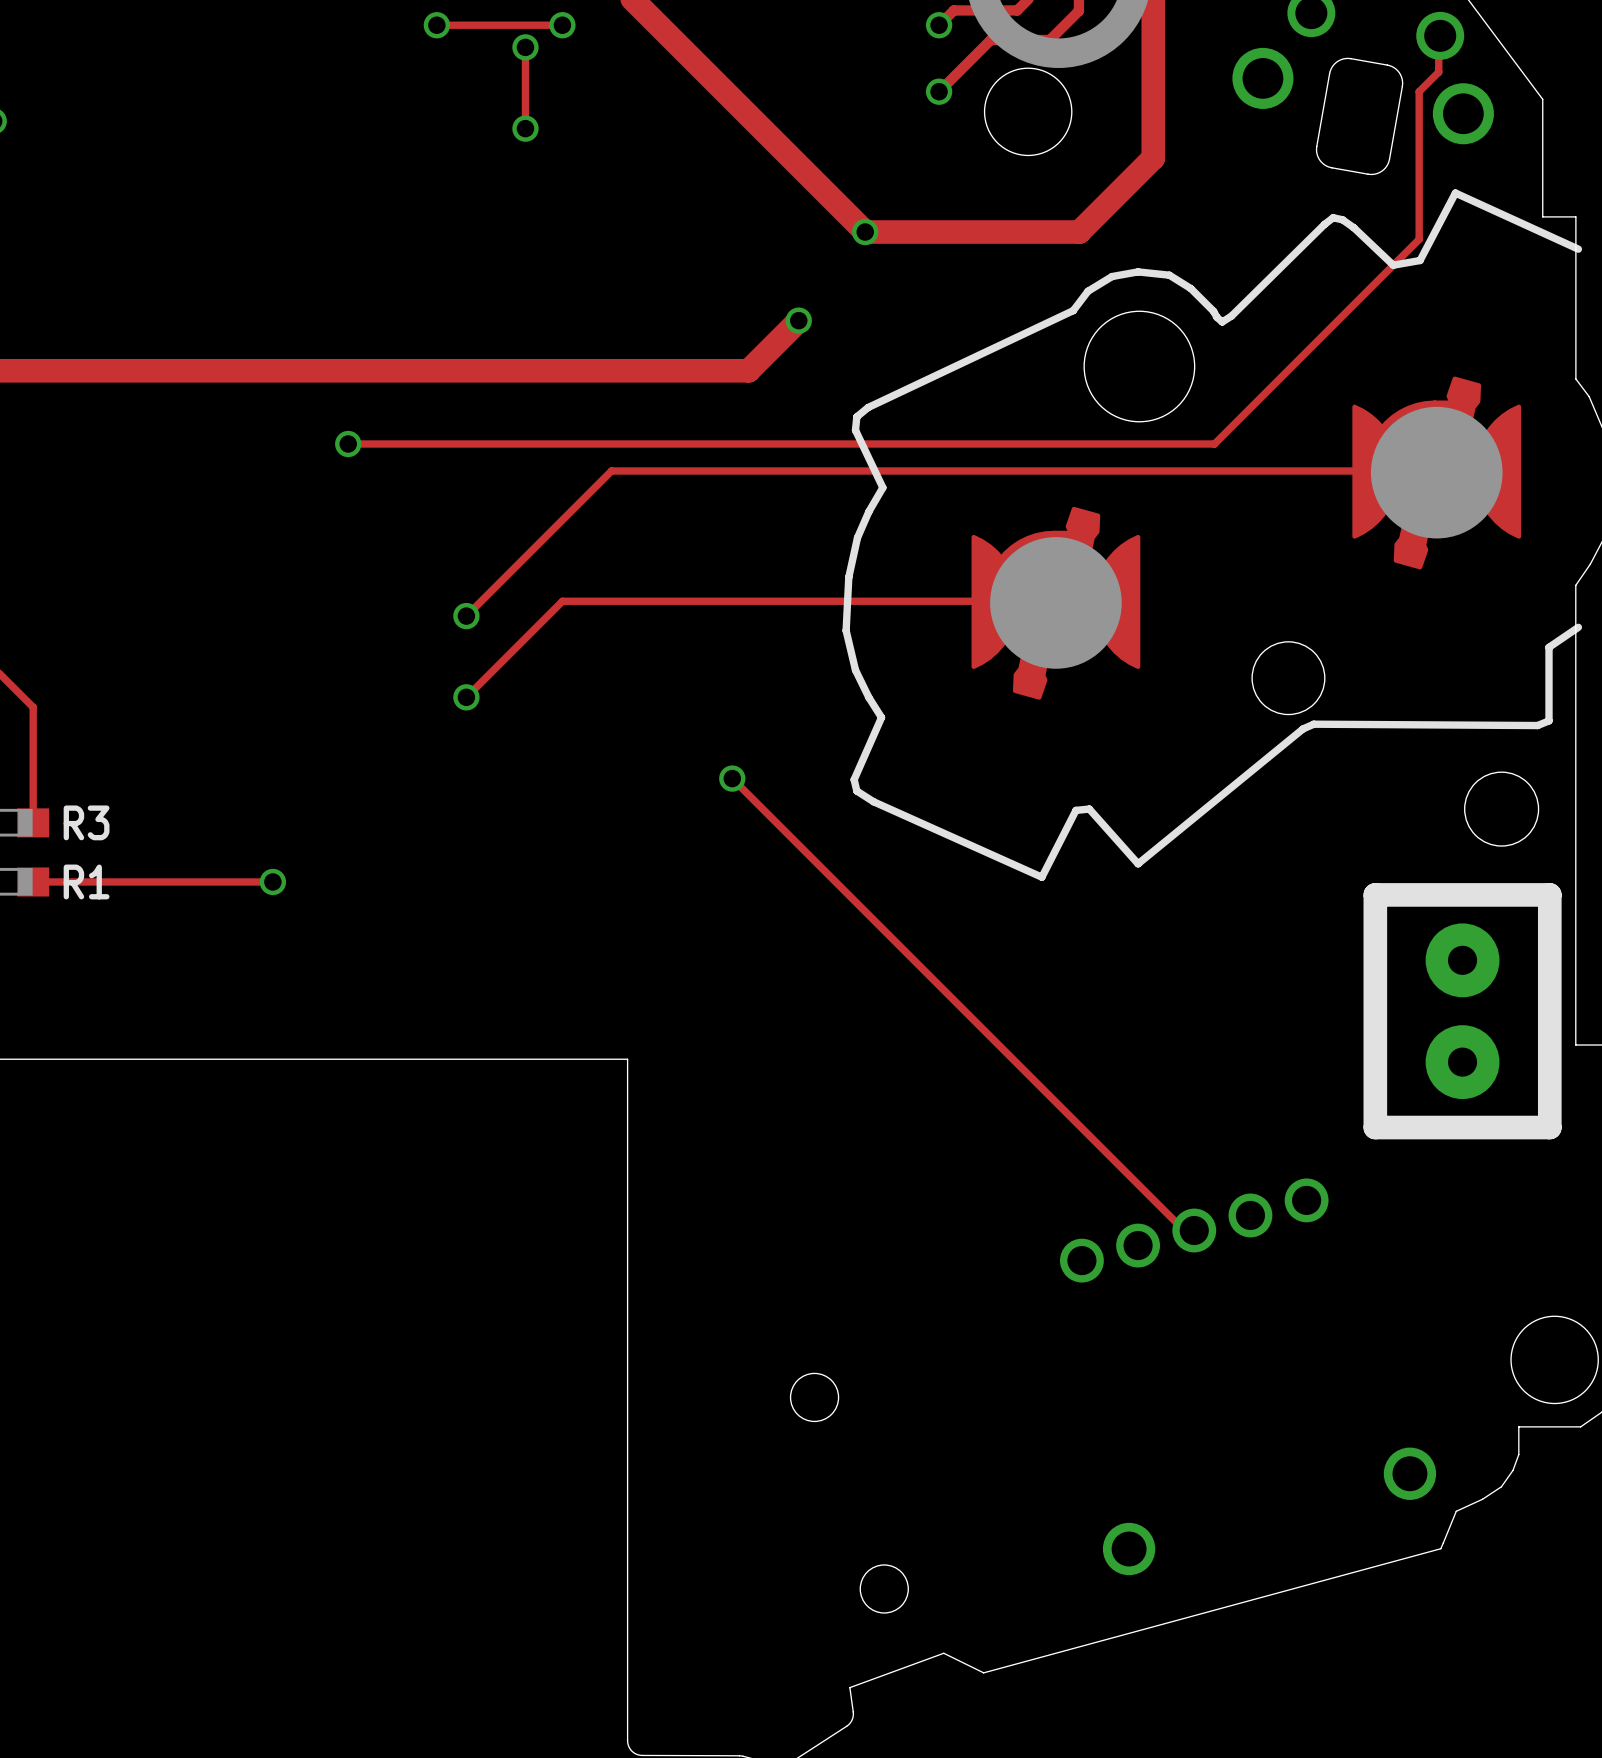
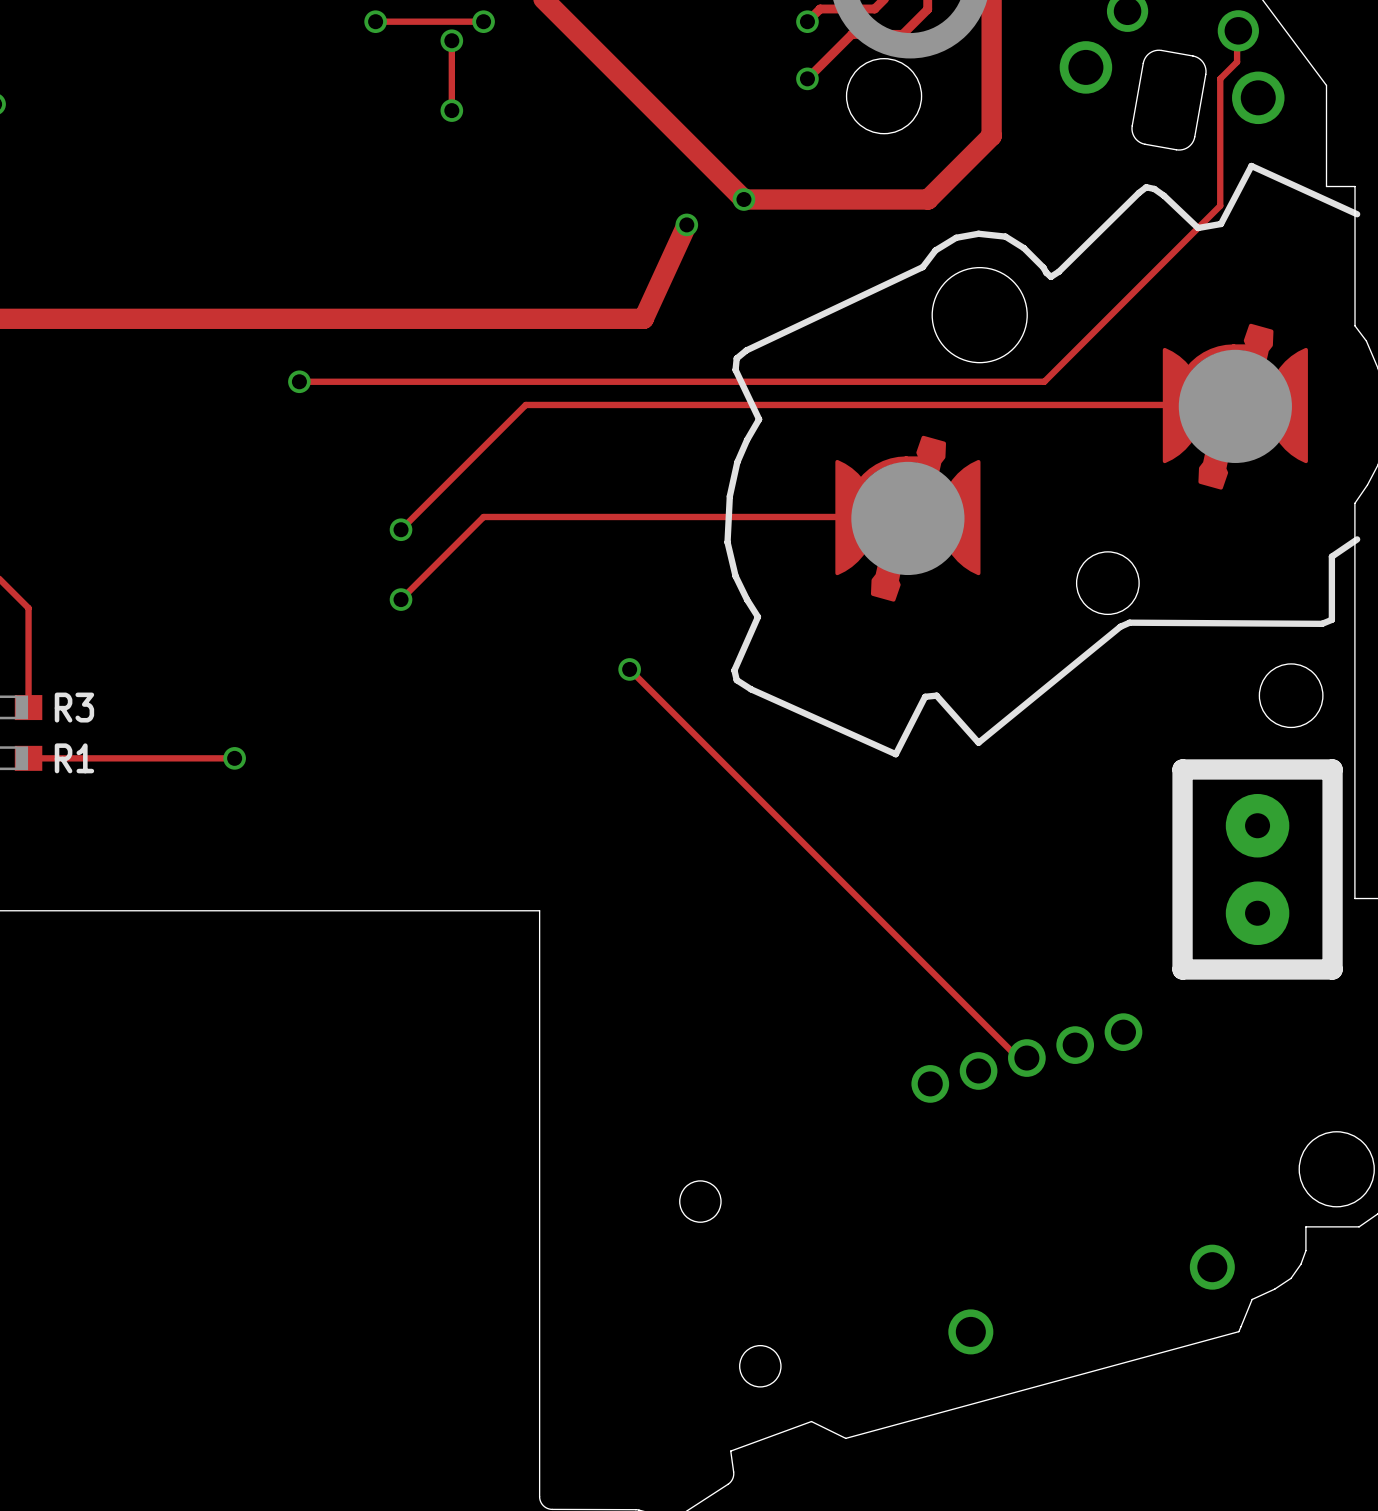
track: (798, 320) (748, 370) -> (686, 224) (643, 318)
via position: (798, 320) -> (686, 224)

